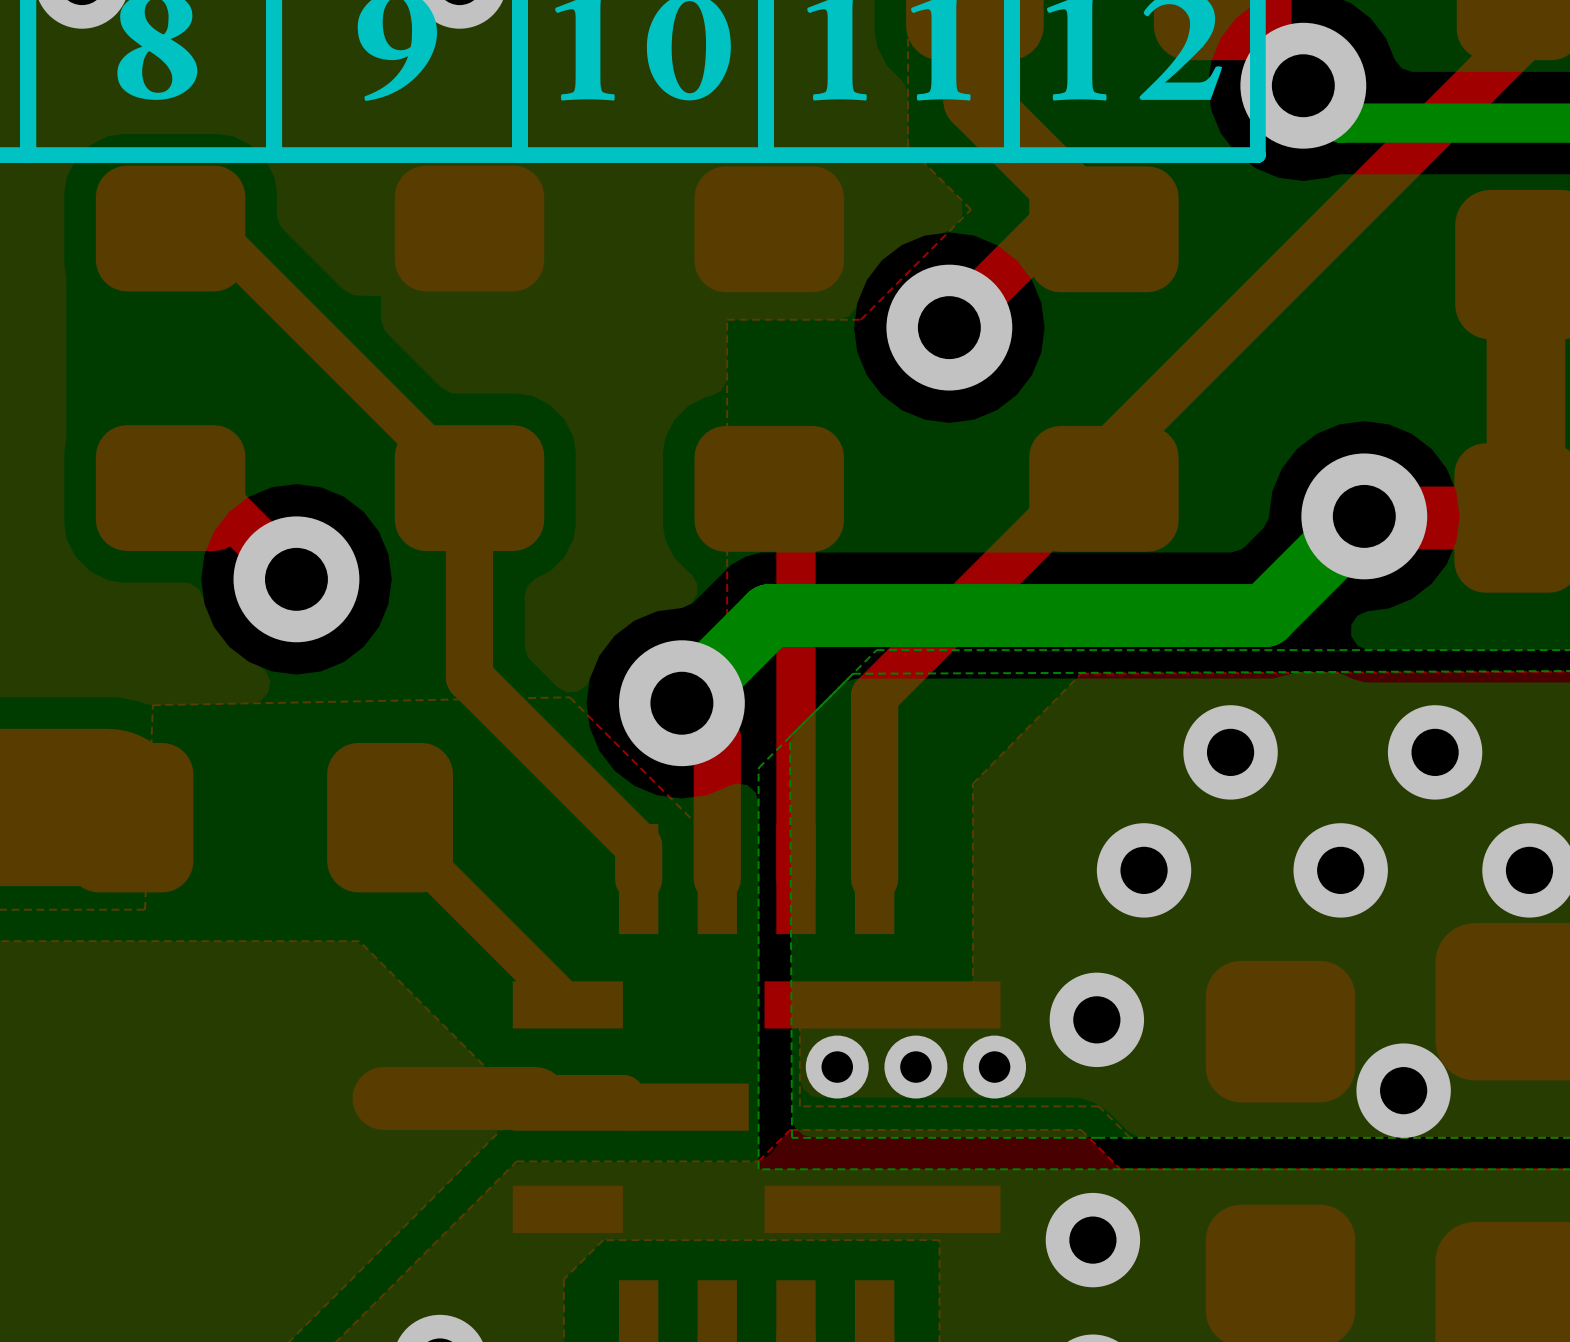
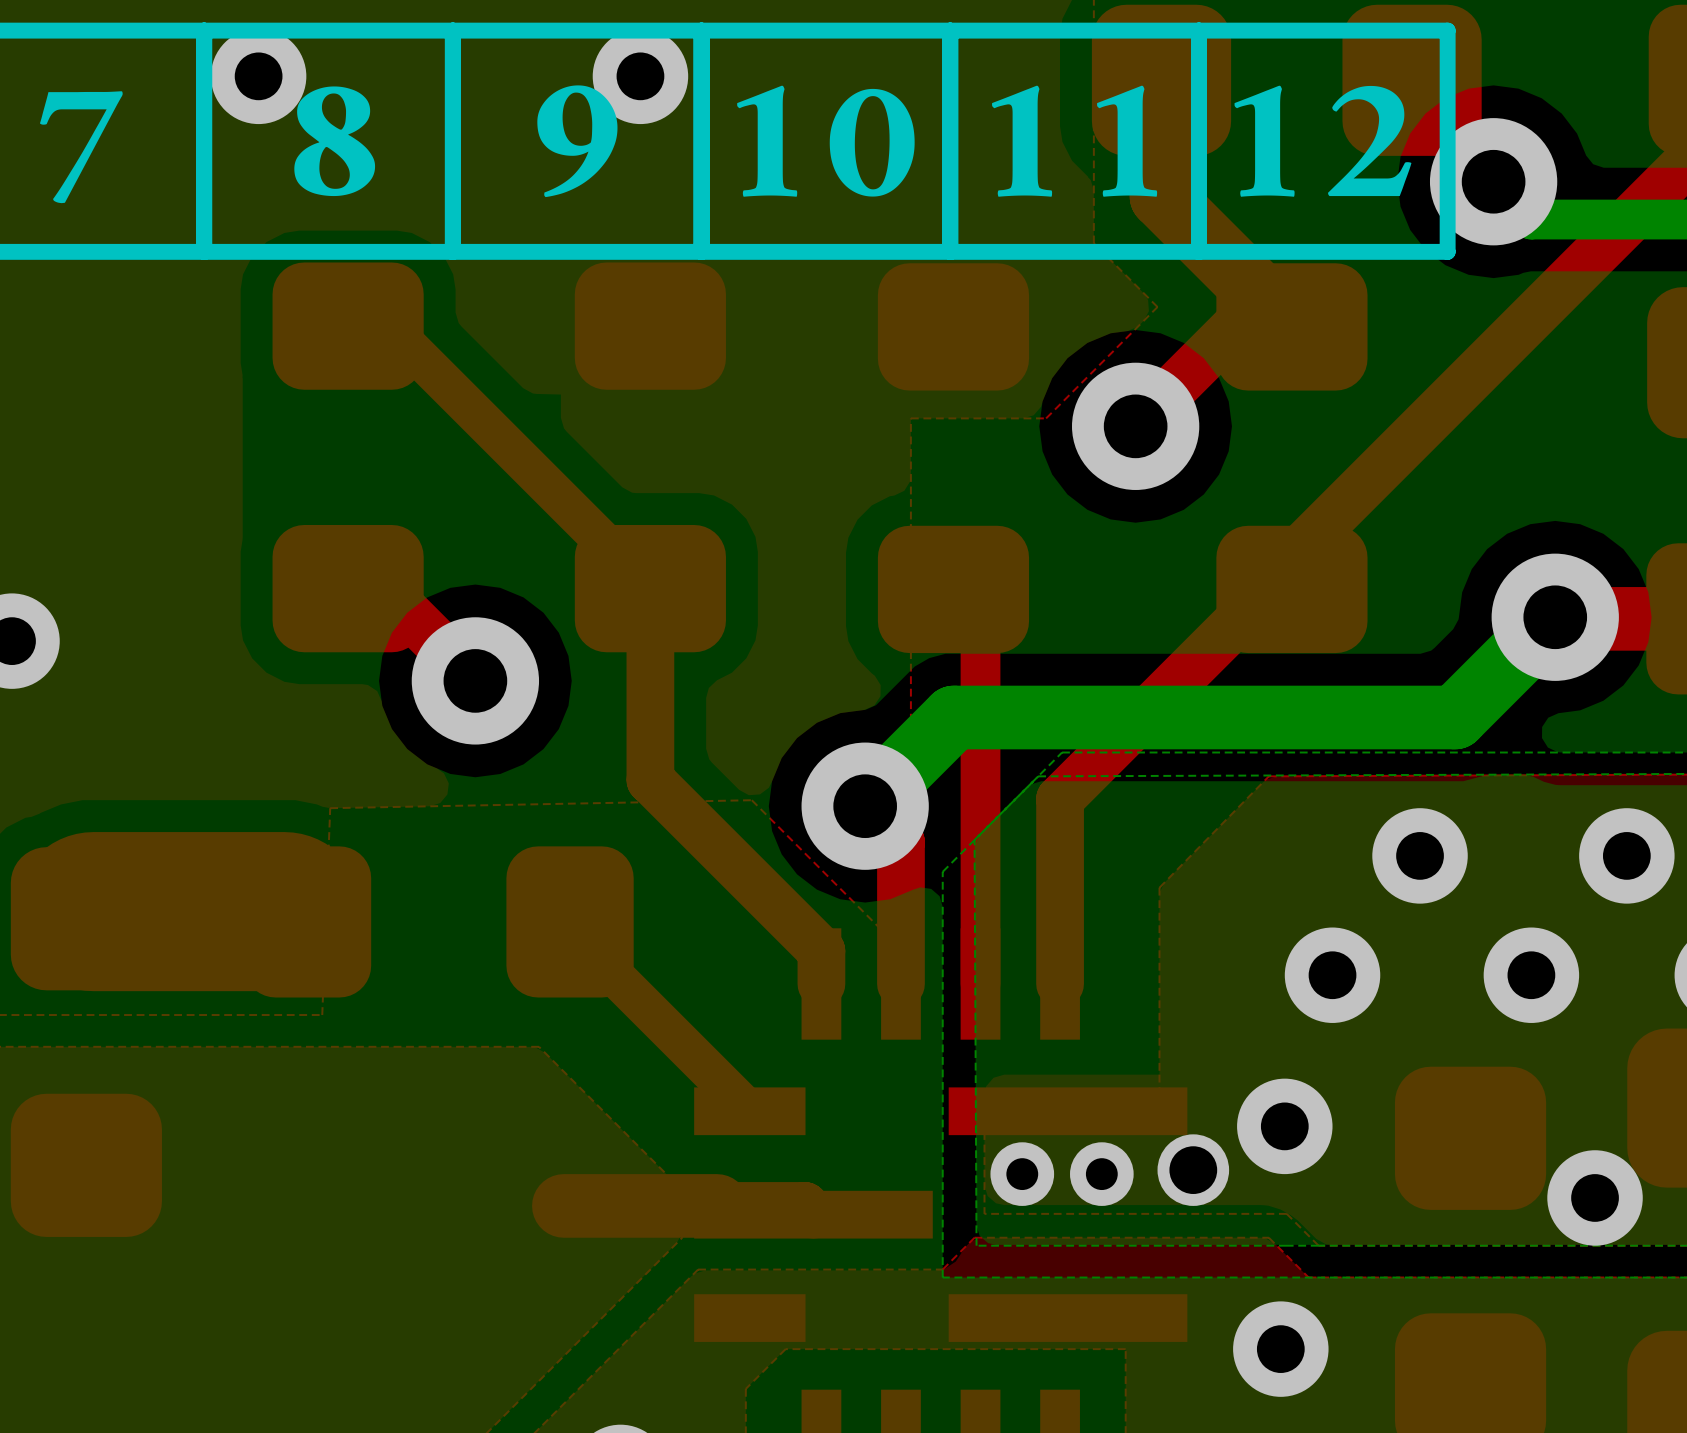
via size: [963, 1035, 1027, 1099] -> [1157, 1134, 1230, 1206]

